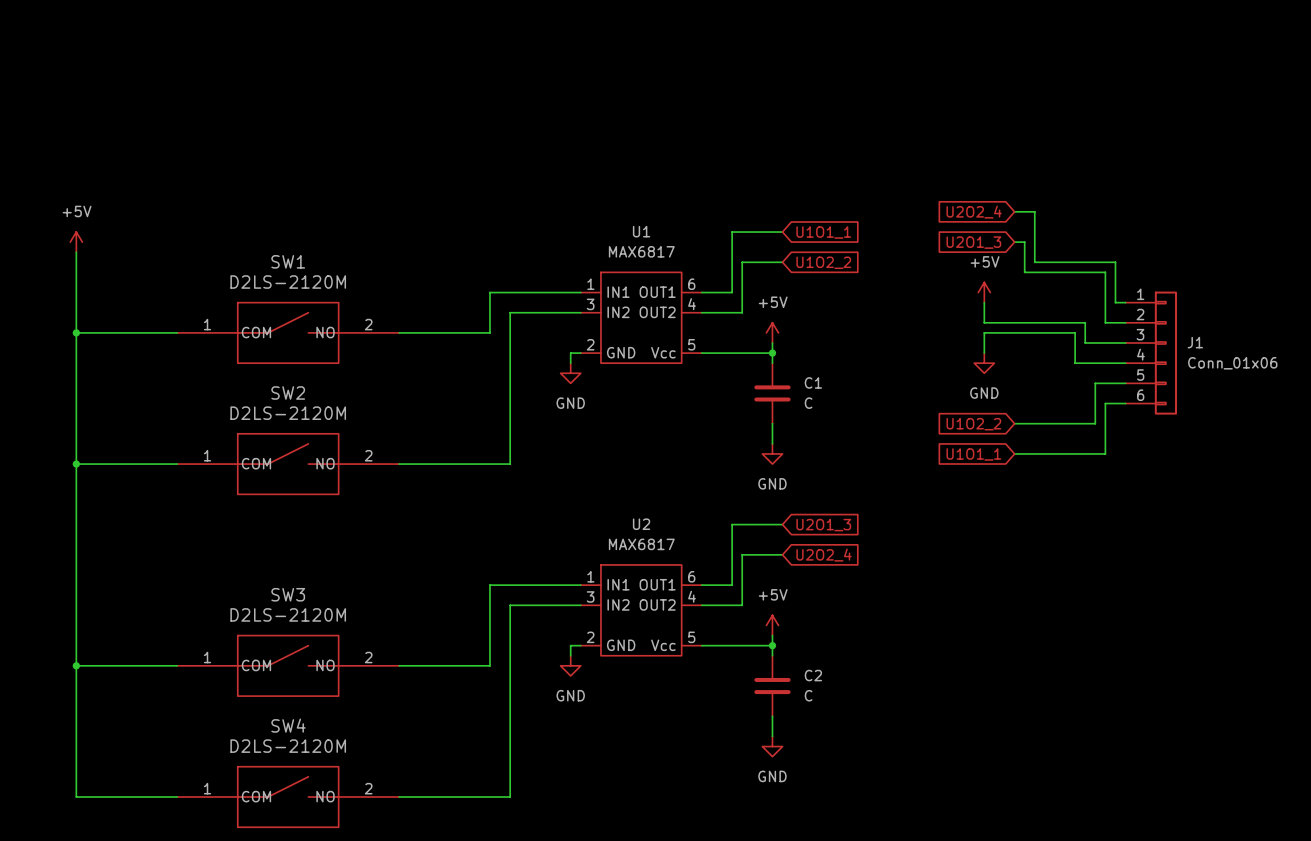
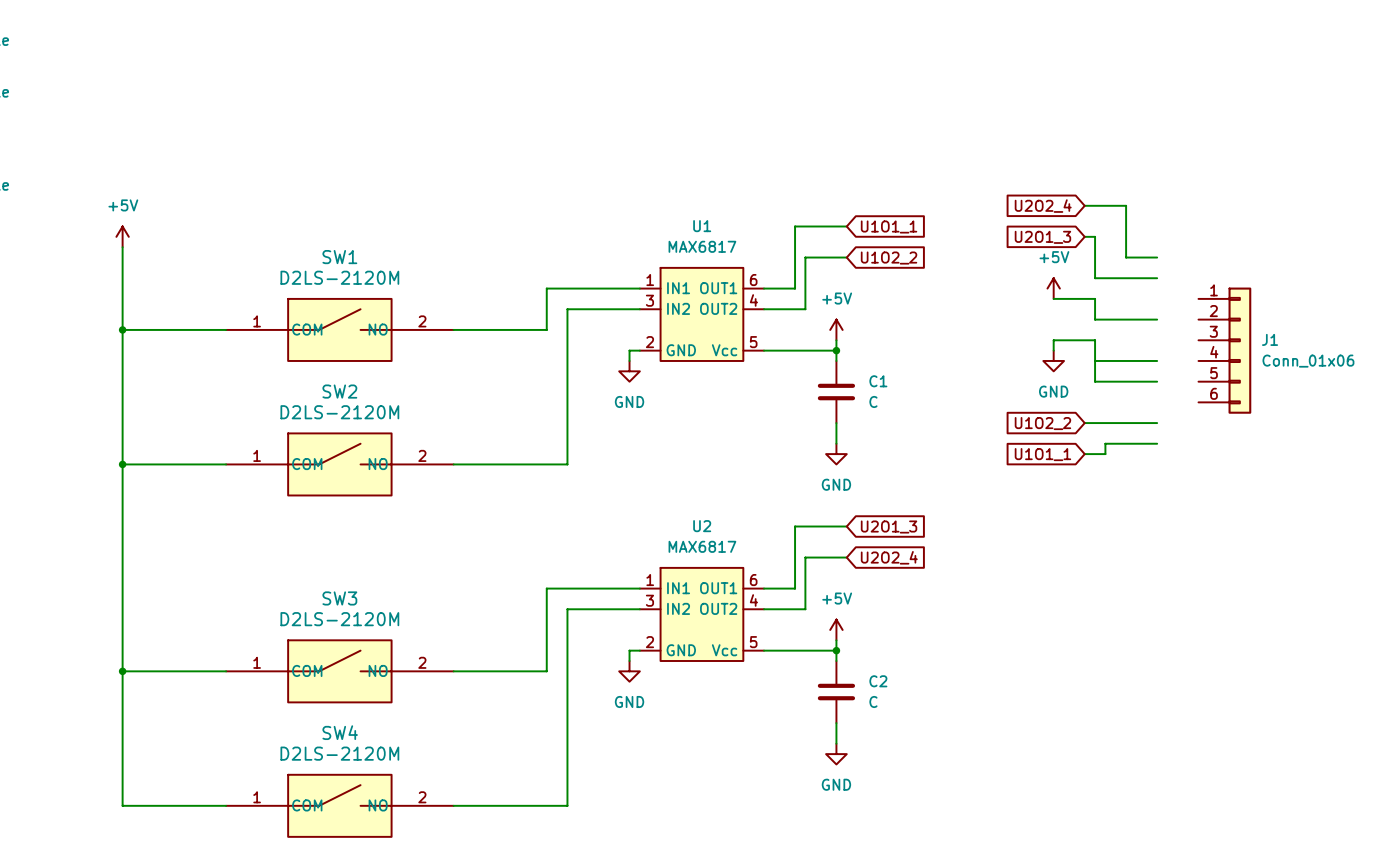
wire: (1034, 211) (1034, 262) (1054, 262) -> (1105, 205) (1126, 205) (1126, 257)
wire: (1085, 262) (1115, 262) (1115, 302) (1125, 302) -> none
wire: (1024, 272) (1105, 272) (1105, 322) (1125, 322) -> (1095, 267) (1095, 278) (1157, 278)
wire: (984, 302) (984, 322) (1024, 322) -> (1053, 298) (1095, 298) (1095, 319)
wire: (1085, 322) (1085, 343) (1125, 343) -> none
wire: (984, 343) (984, 332) (1075, 332) (1075, 363) -> (1053, 340) (1095, 340) (1095, 381) (1157, 381)
wire: none -> (1095, 360) (1146, 360)
wire: (1085, 363) (1125, 363) -> none
wire: (1125, 383) (1095, 383) (1095, 423) (1085, 423) -> none
wire: (1125, 403) (1105, 403) (1105, 453) (1034, 453) -> (1157, 443) (1105, 443) (1105, 454)

